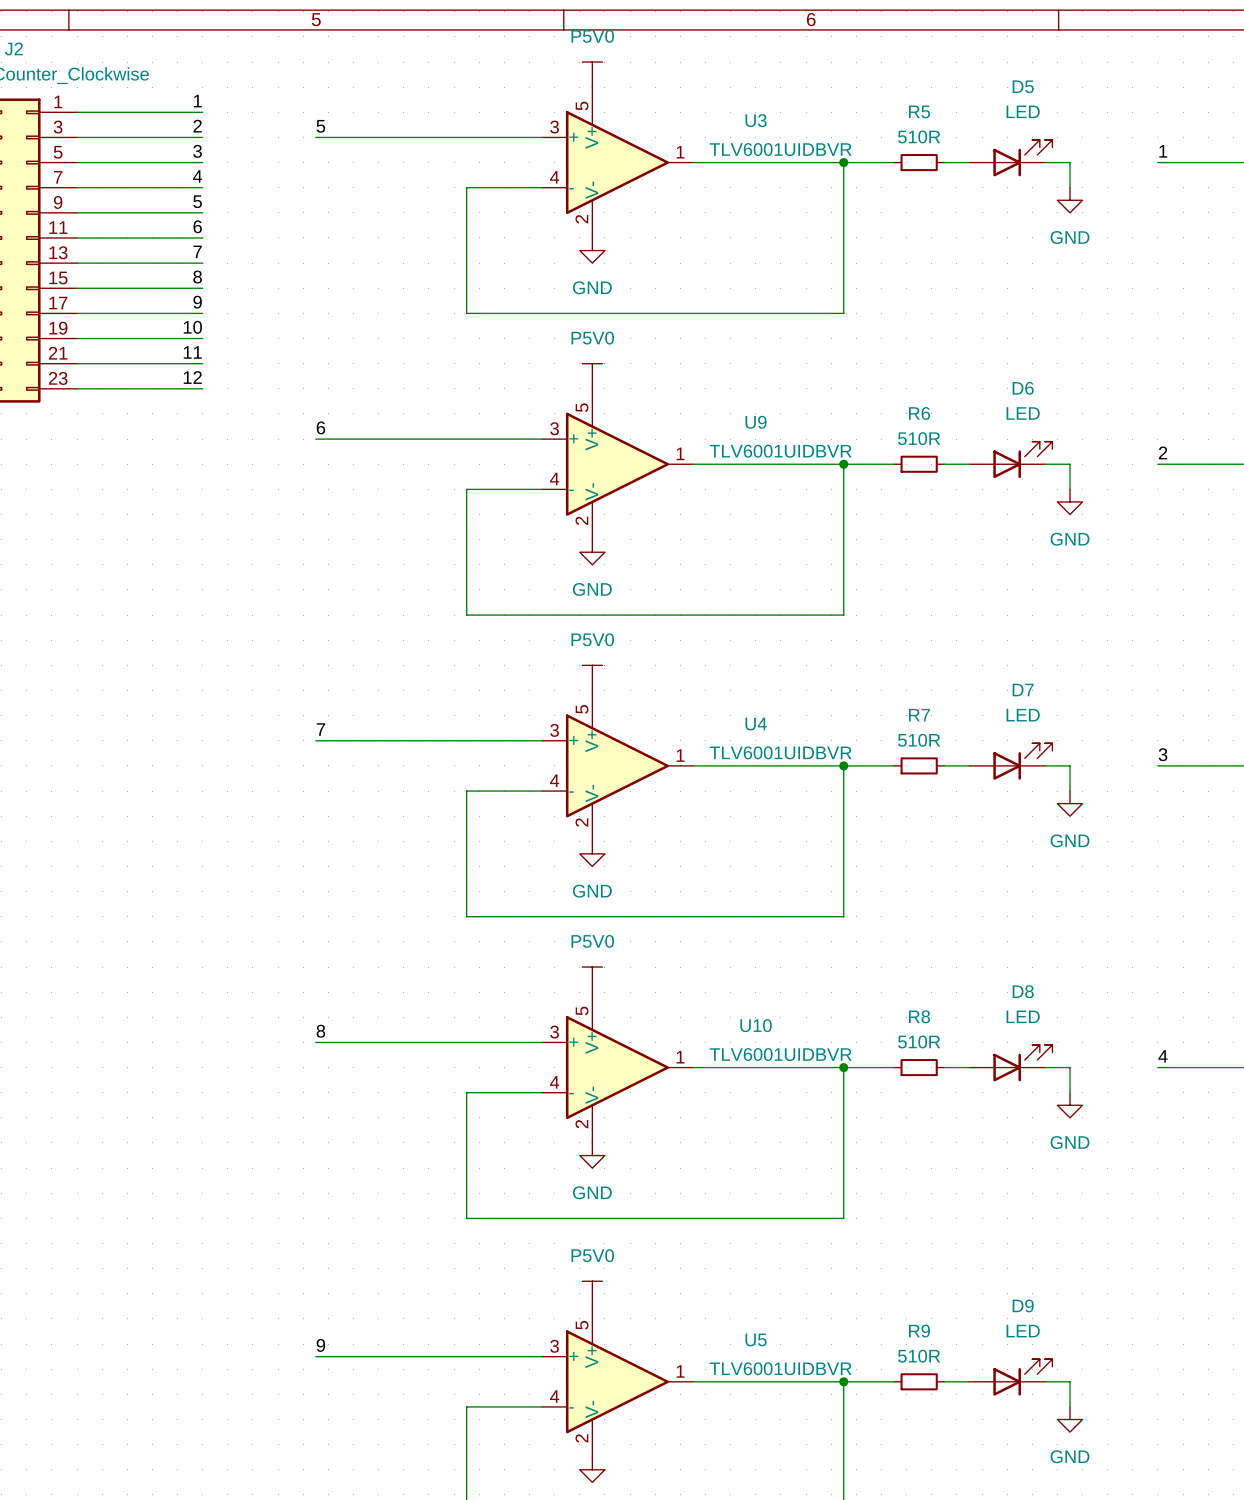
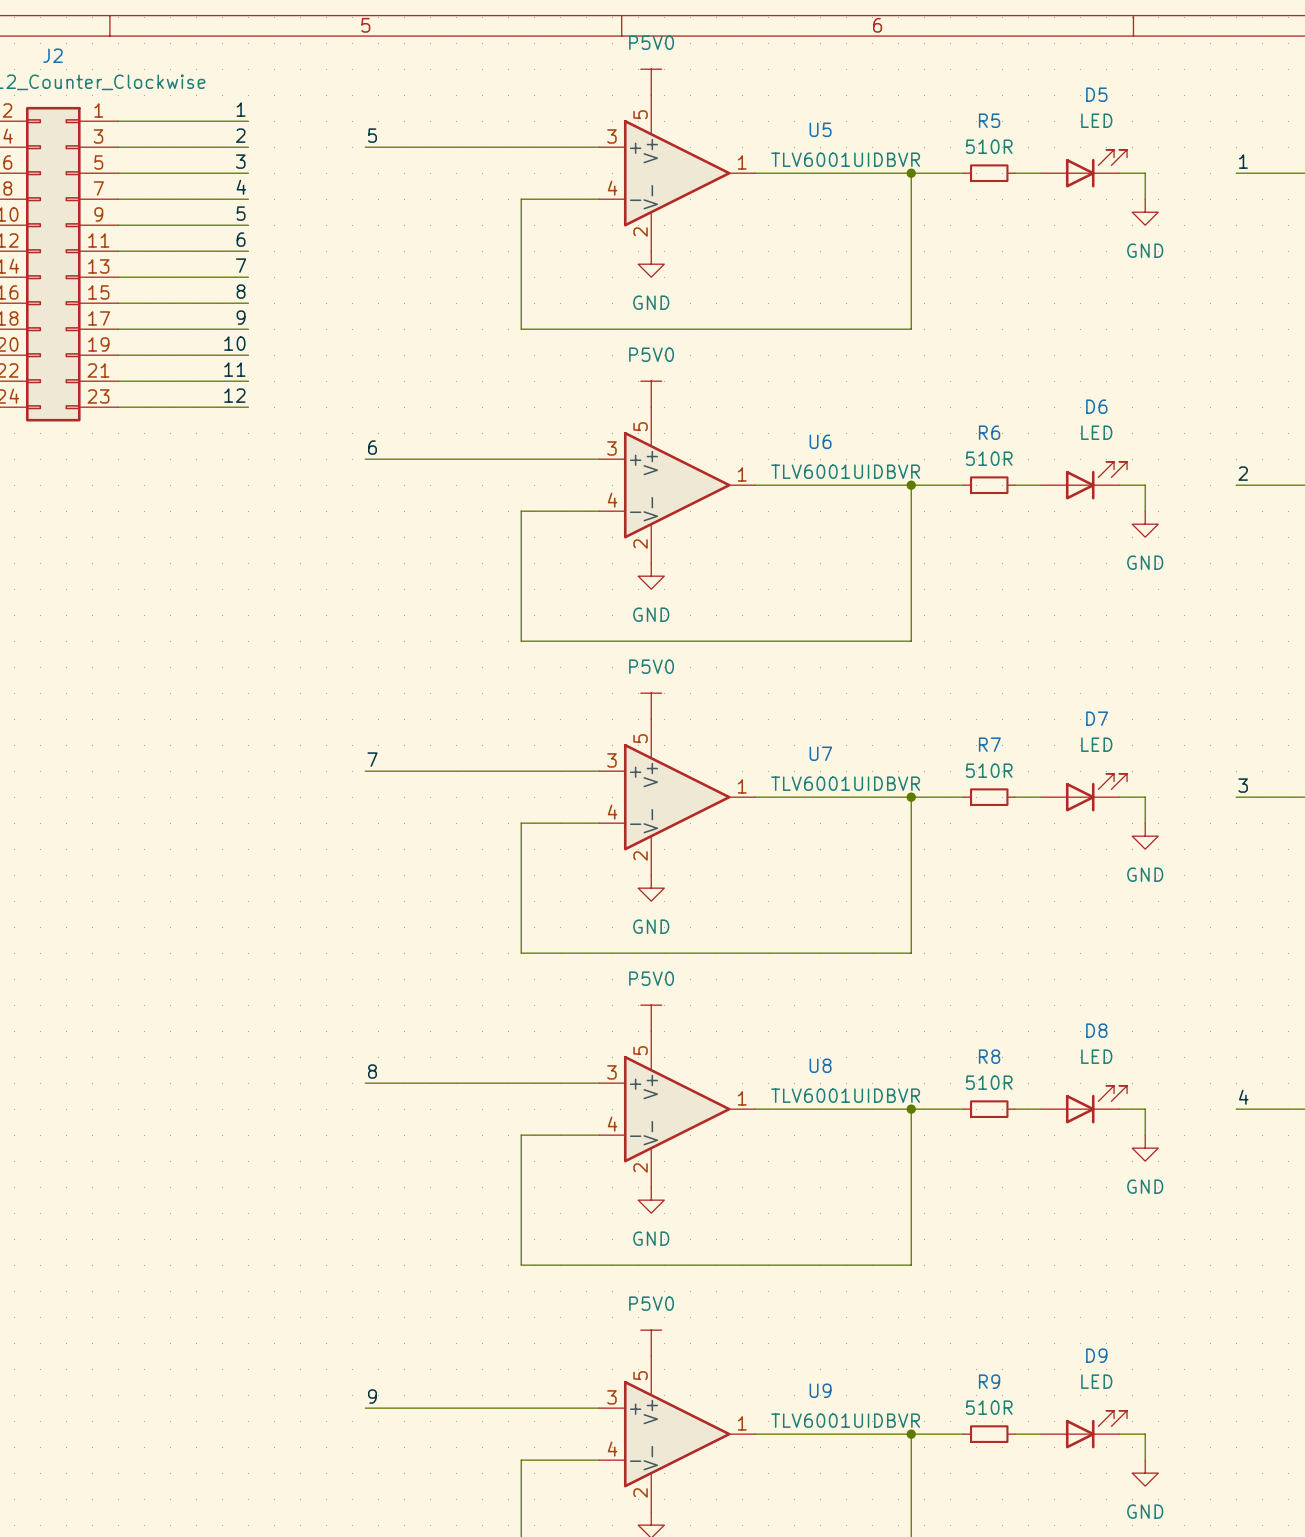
U3 name: U3 (756, 120) -> U5 (820, 129)
U9 name: U9 (756, 422) -> U6 (820, 441)
U4 name: U4 (756, 724) -> U7 (820, 753)
U10 name: U10 (756, 1025) -> U8 (820, 1065)
U5 name: U5 (756, 1339) -> U9 (820, 1390)

